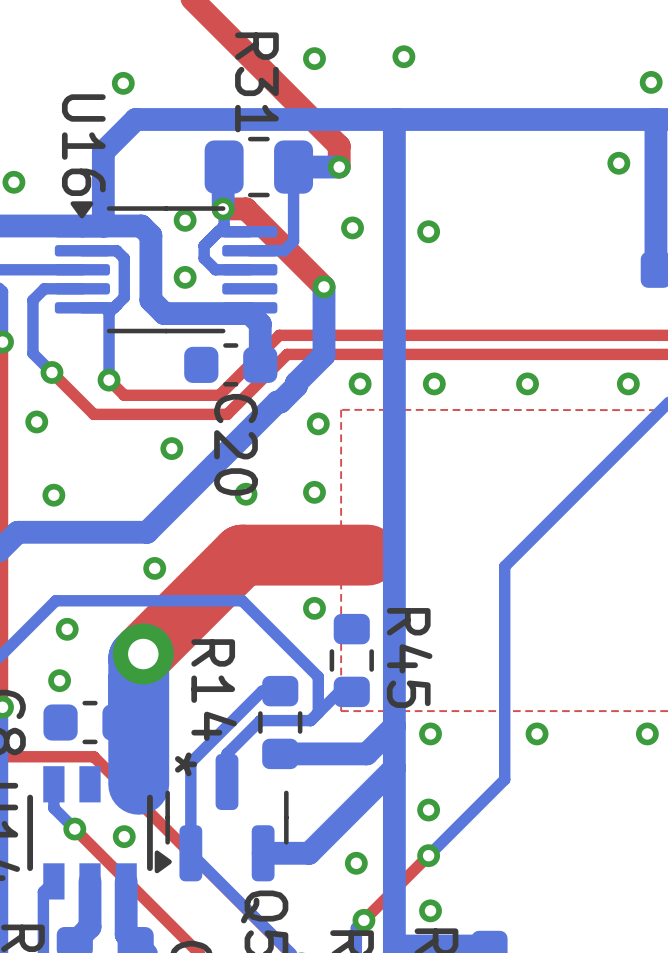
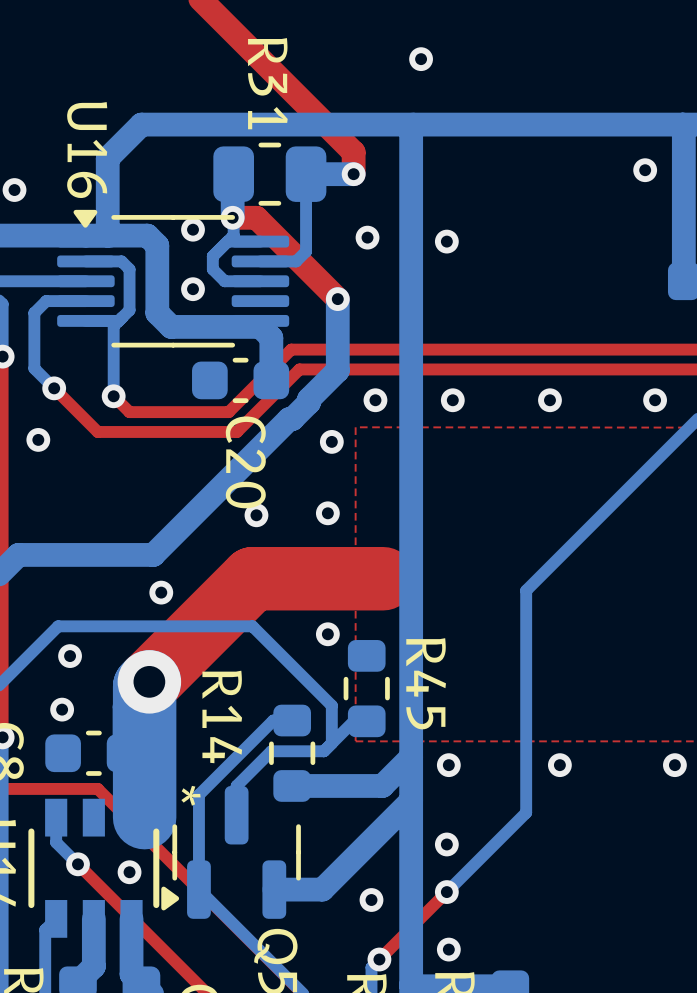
via: (314, 58) -> none
via: (651, 82) -> none
via: (123, 83) -> none
via: (171, 448) -> none
via: (53, 495) -> none

